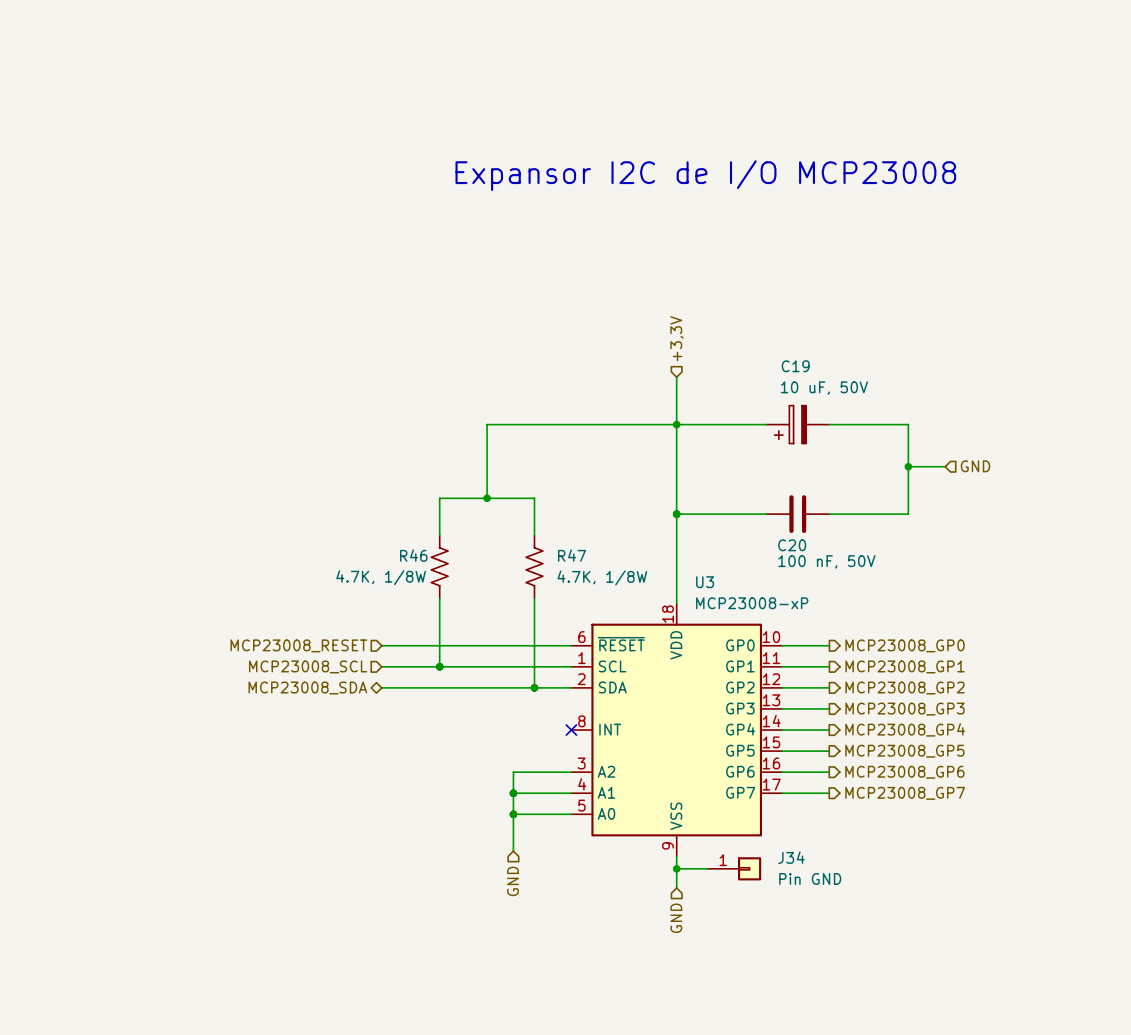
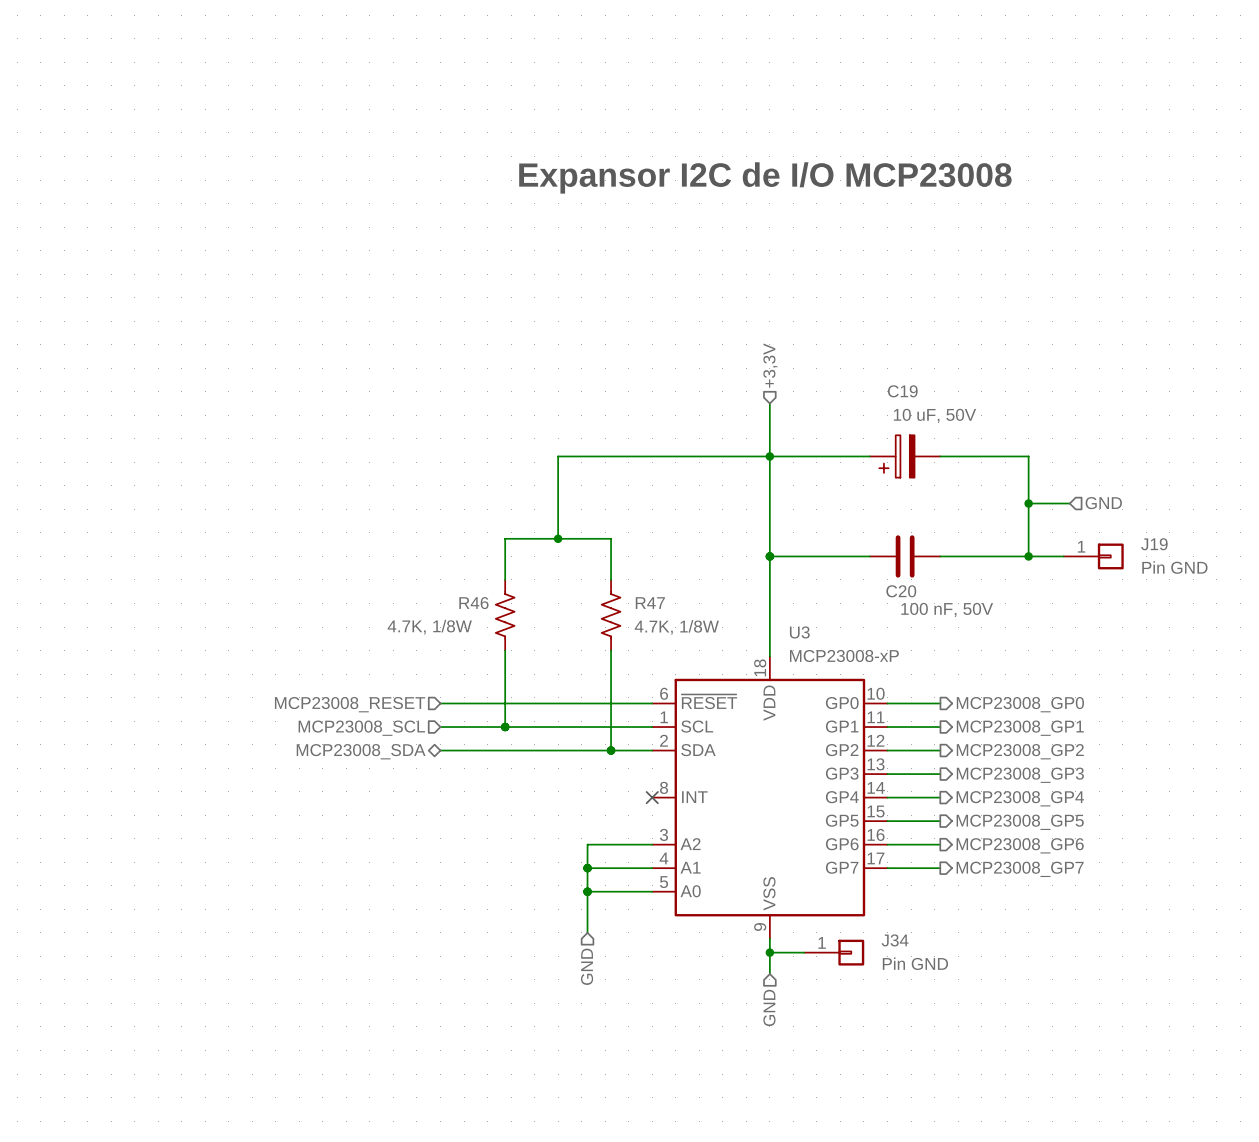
wire: none -> (1028, 556) (1063, 556)
junction: none -> (1028, 556)
J19: none -> Pin GND (1093, 556)

